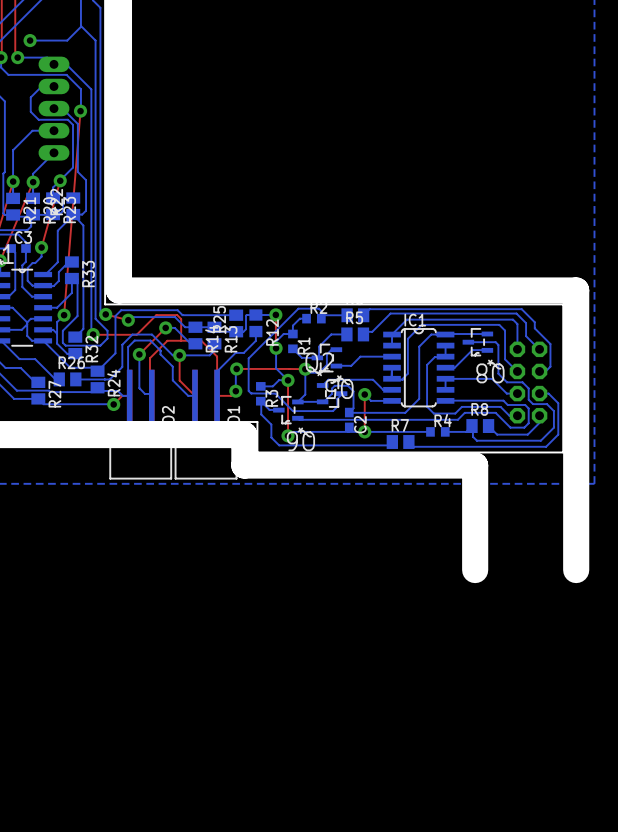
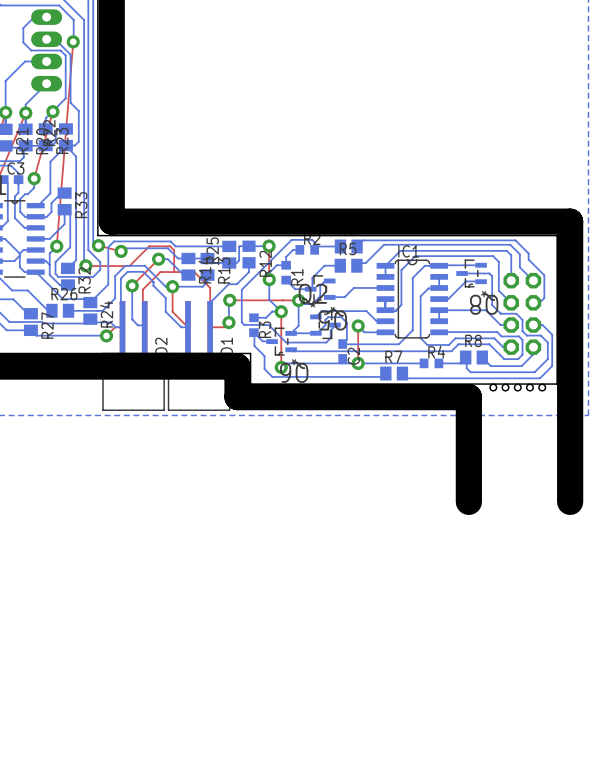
hole: none -> (493, 387)
hole: none -> (505, 387)
hole: none -> (517, 387)
hole: none -> (529, 387)
hole: none -> (542, 387)

